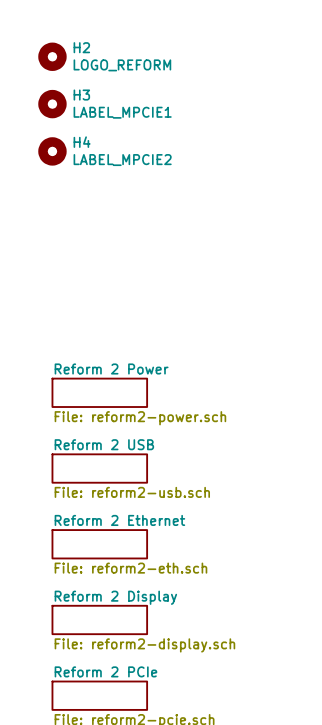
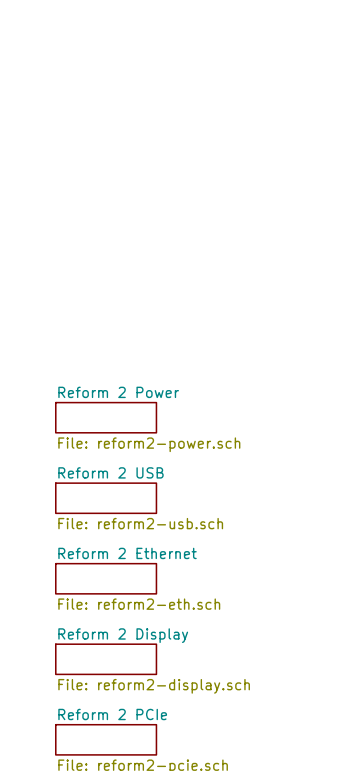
H2: LOGO_REFORM (52, 56) -> none
H3: LABEL_MPCIE1 (52, 104) -> none
H4: LABEL_MPCIE2 (52, 151) -> none

